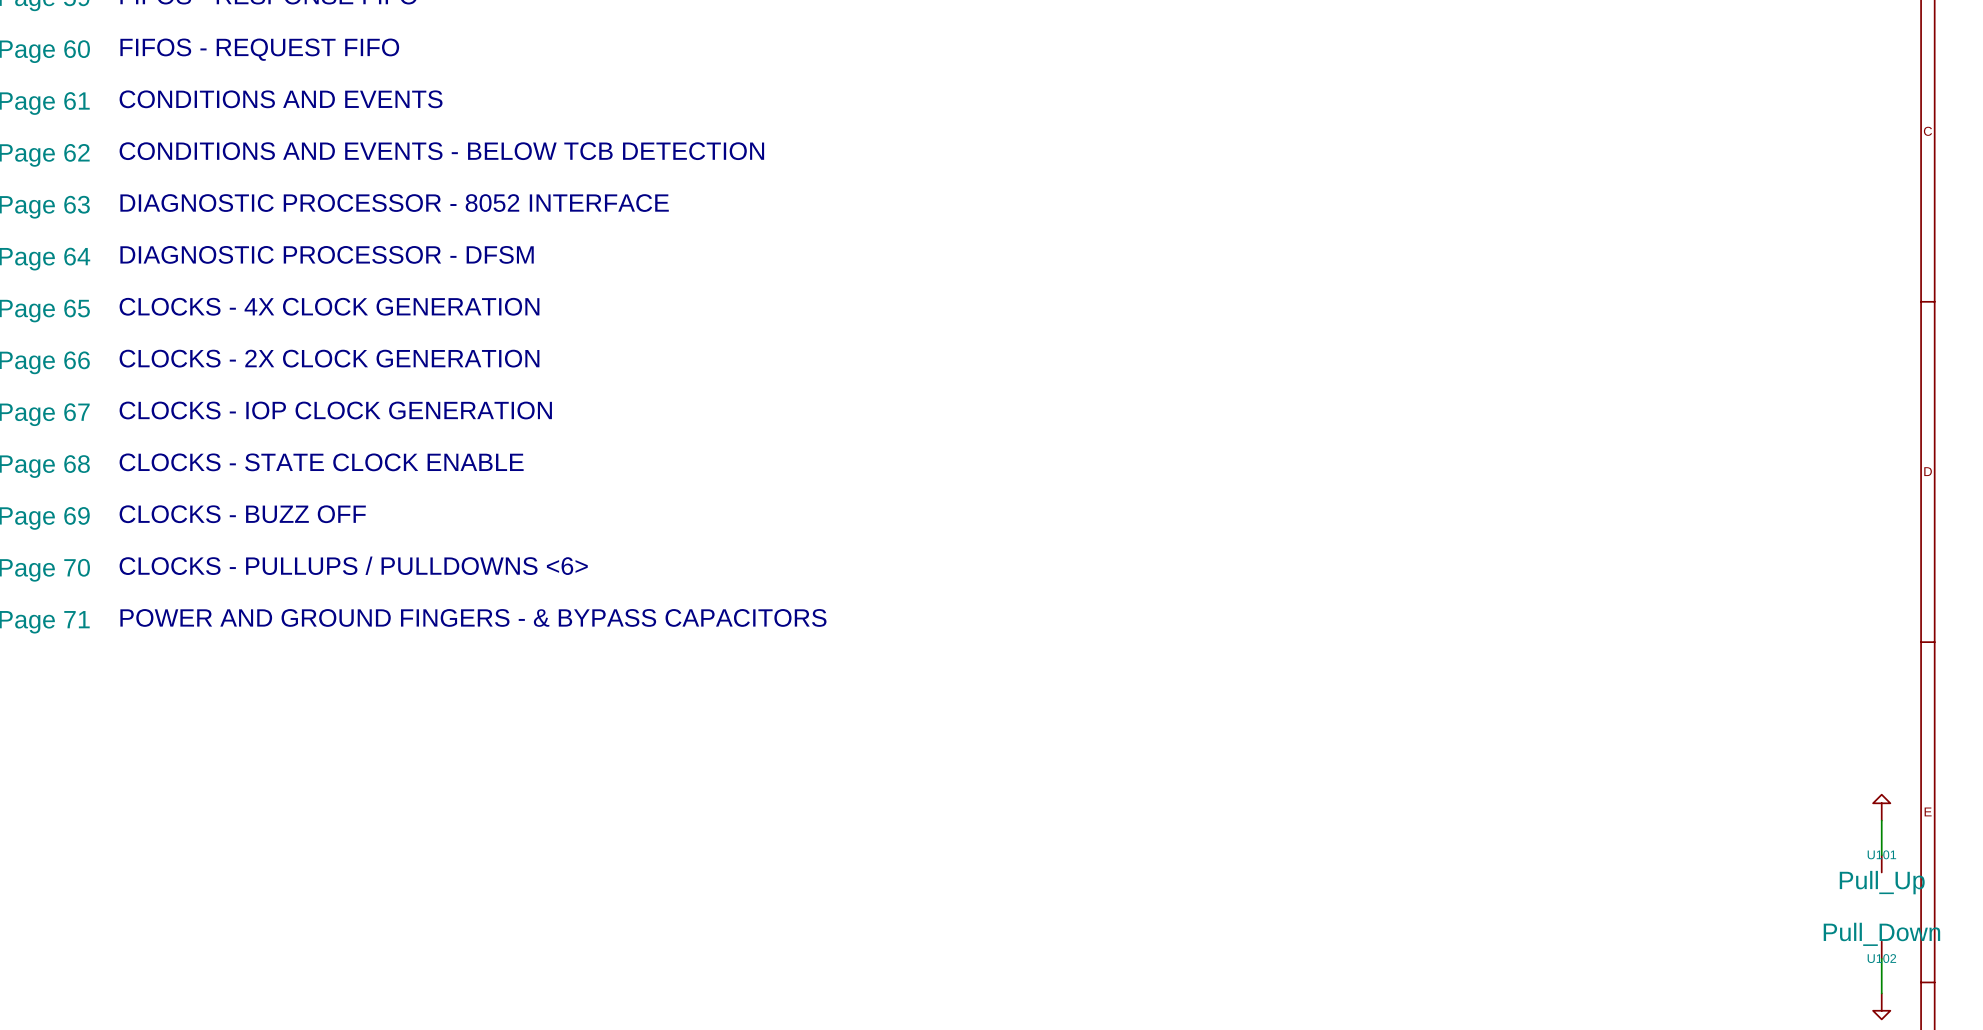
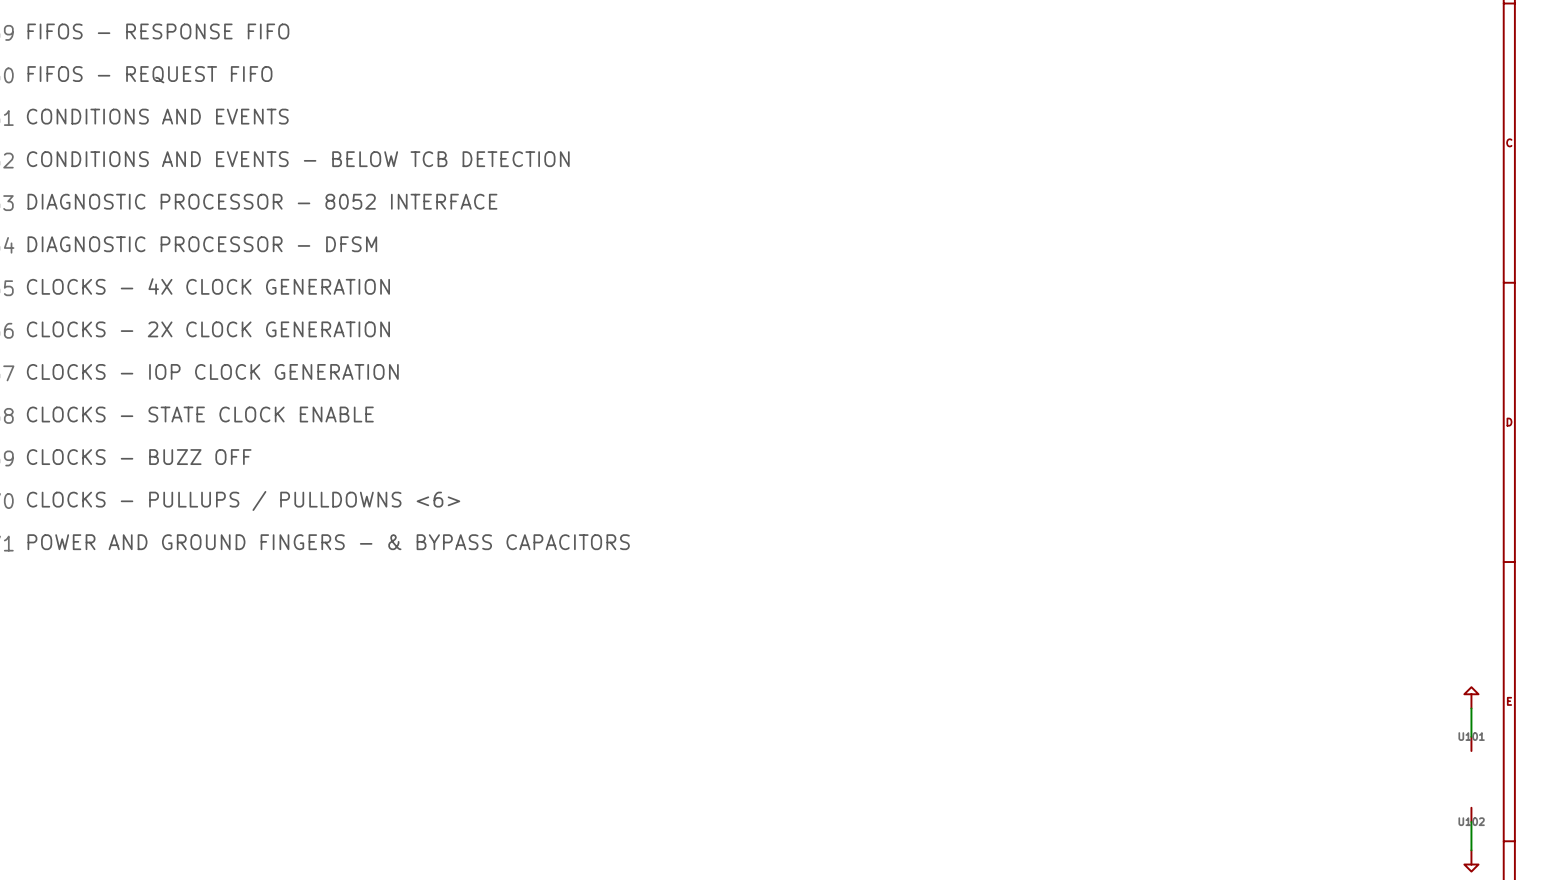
U101 value: Pull_Up (1882, 882) -> none
U102 value: Pull_Down (1881, 934) -> none

